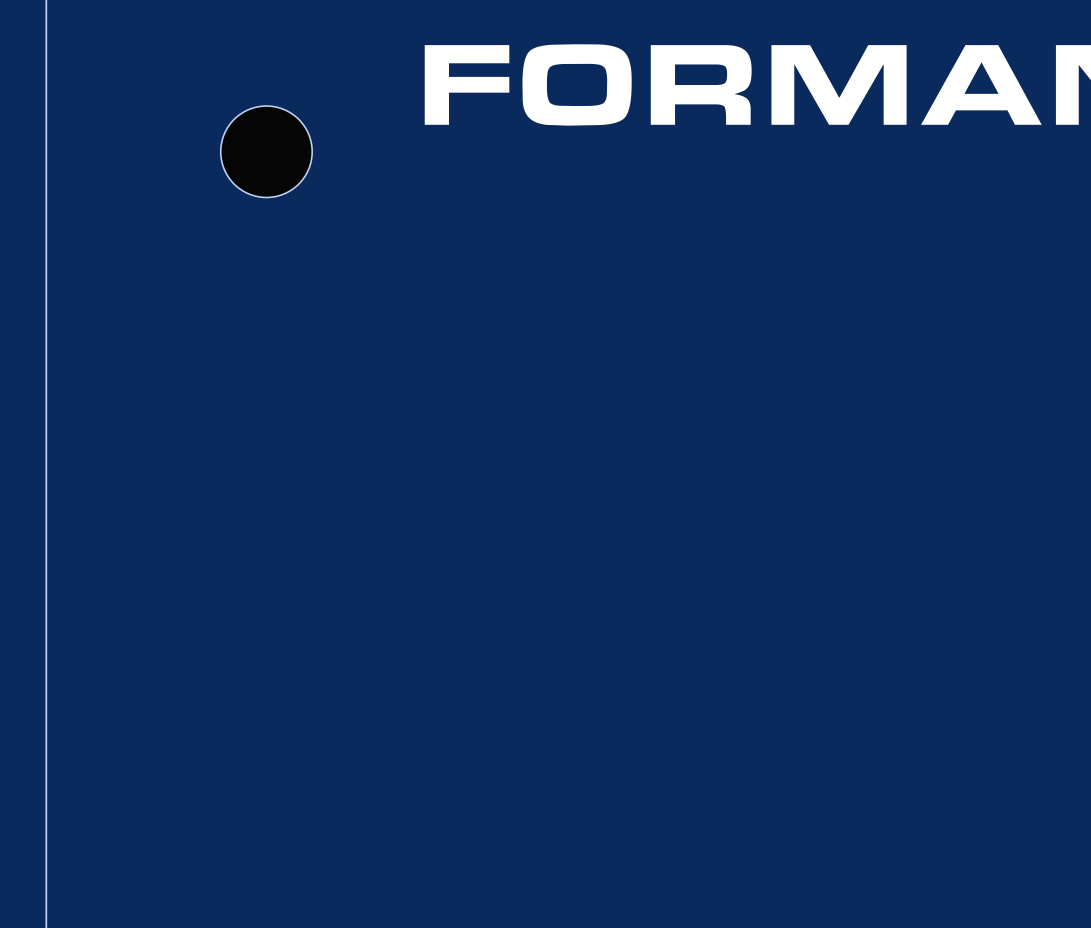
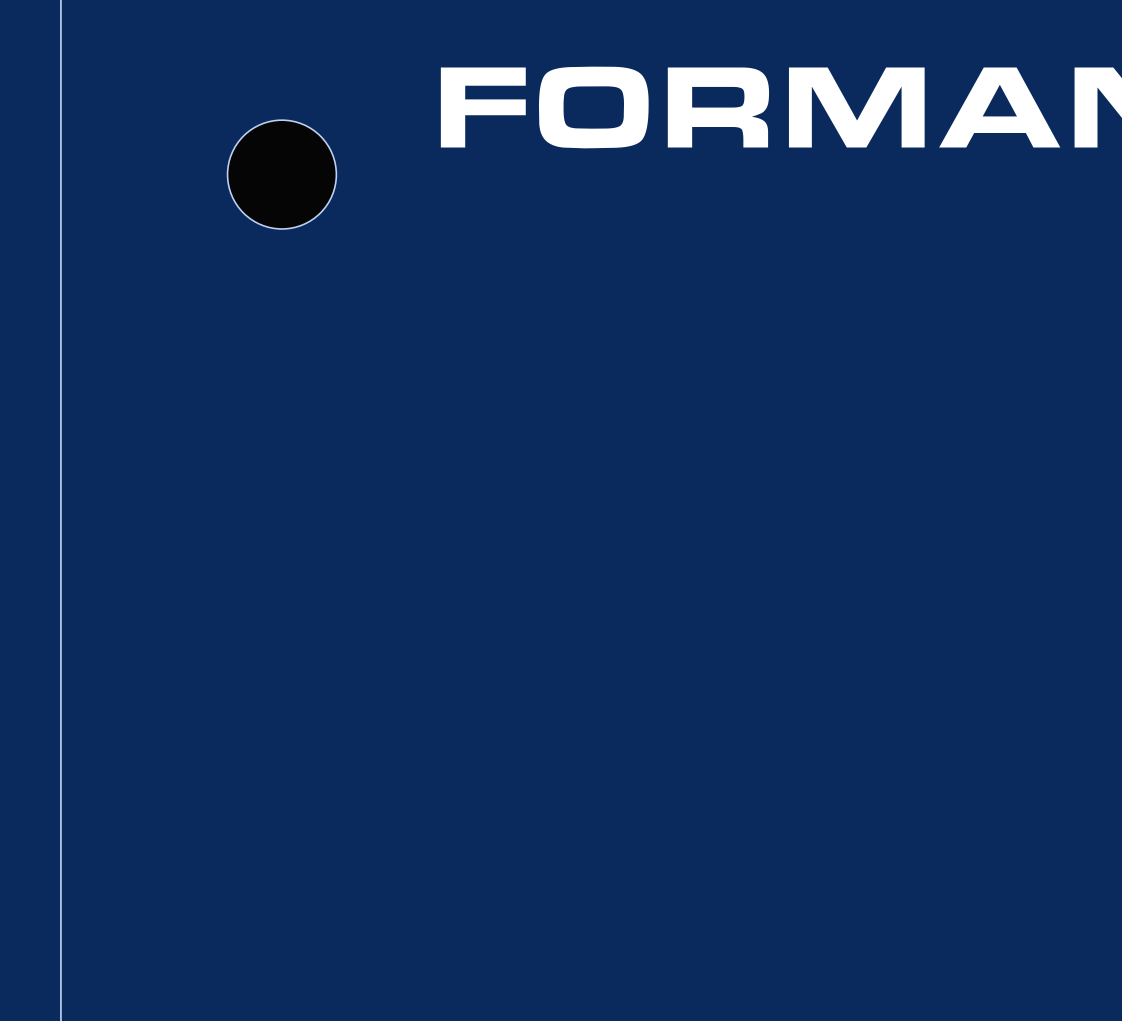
part footprint: [220, 106, 313, 198] -> [227, 120, 337, 229]

